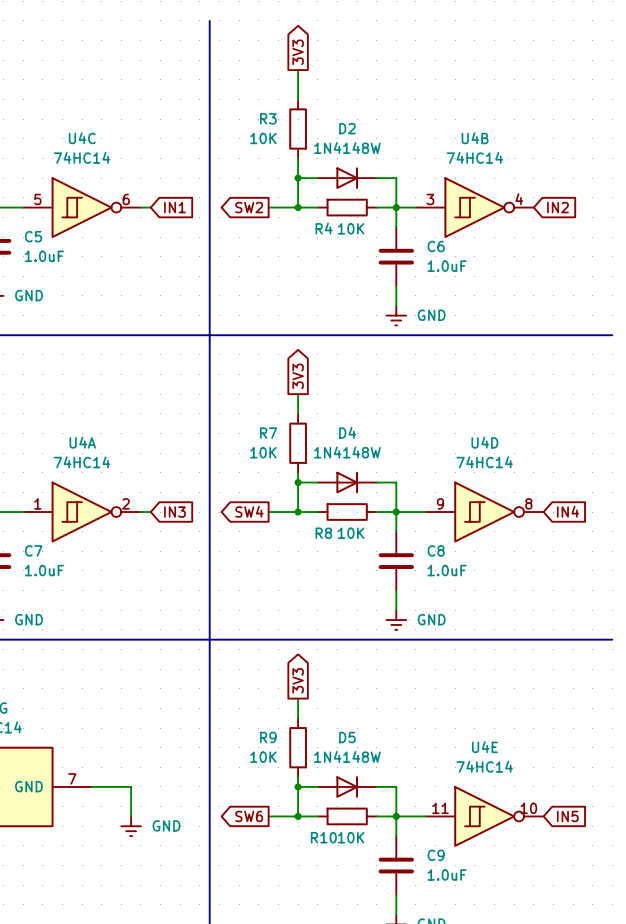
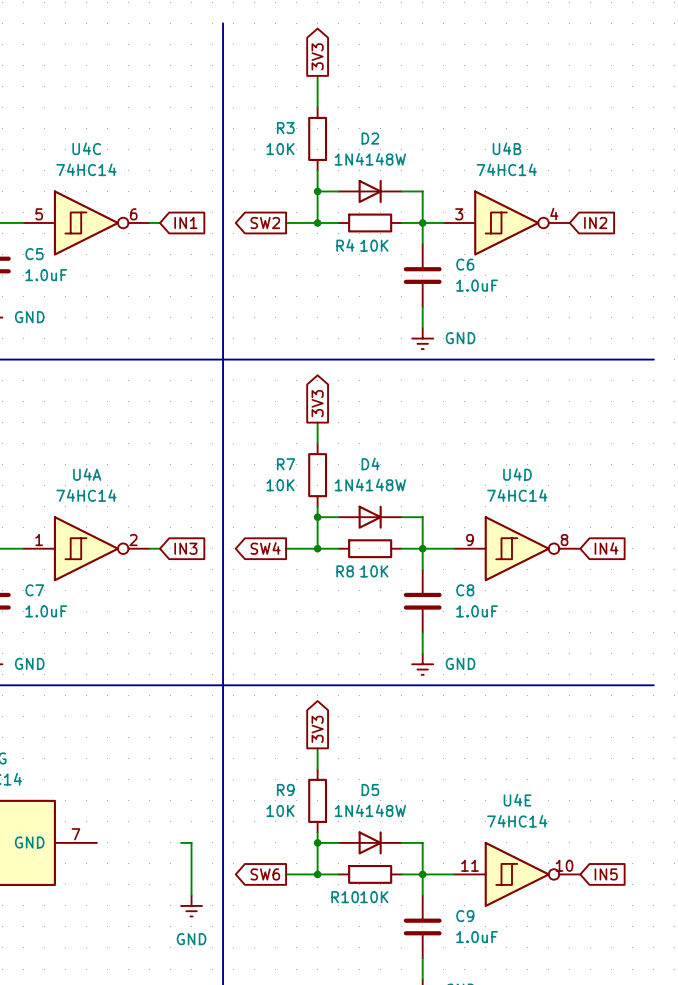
wire: (91, 786) (131, 786) (131, 816) -> none
wire: none -> (181, 842) (191, 842) (191, 895)
power symbol text position: GND (166, 825) -> GND (191, 939)
power symbol position: GND (131, 826) -> GND (191, 905)

